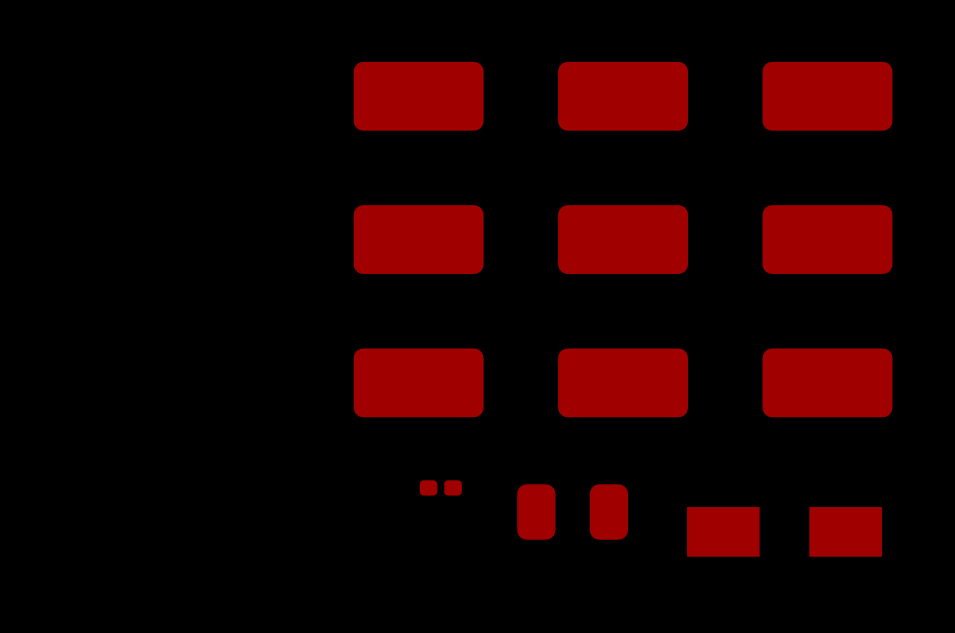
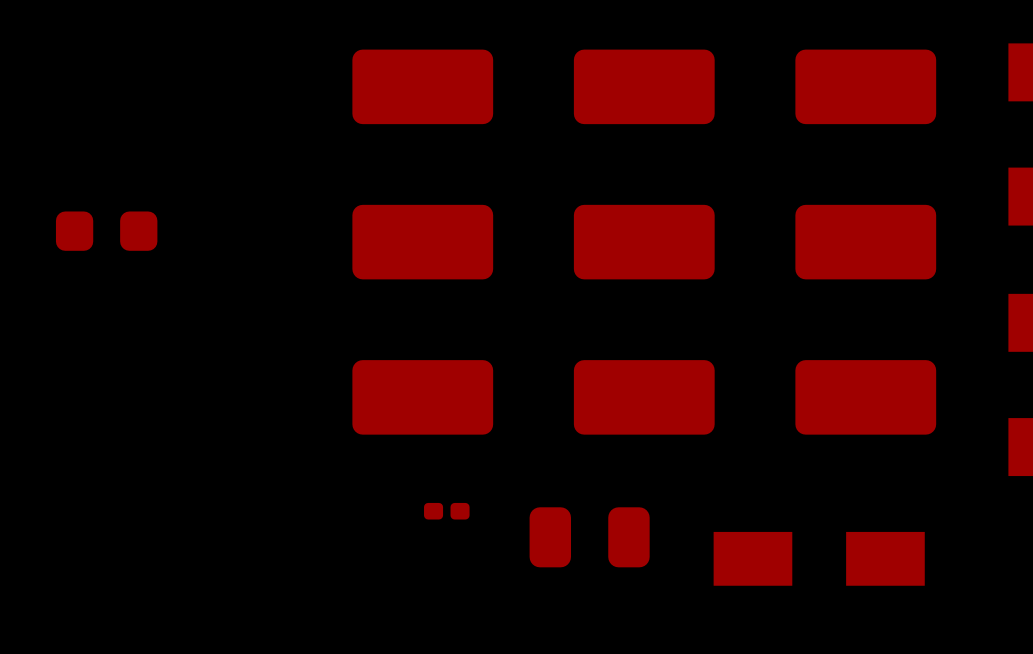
part: none -> (106, 231)

